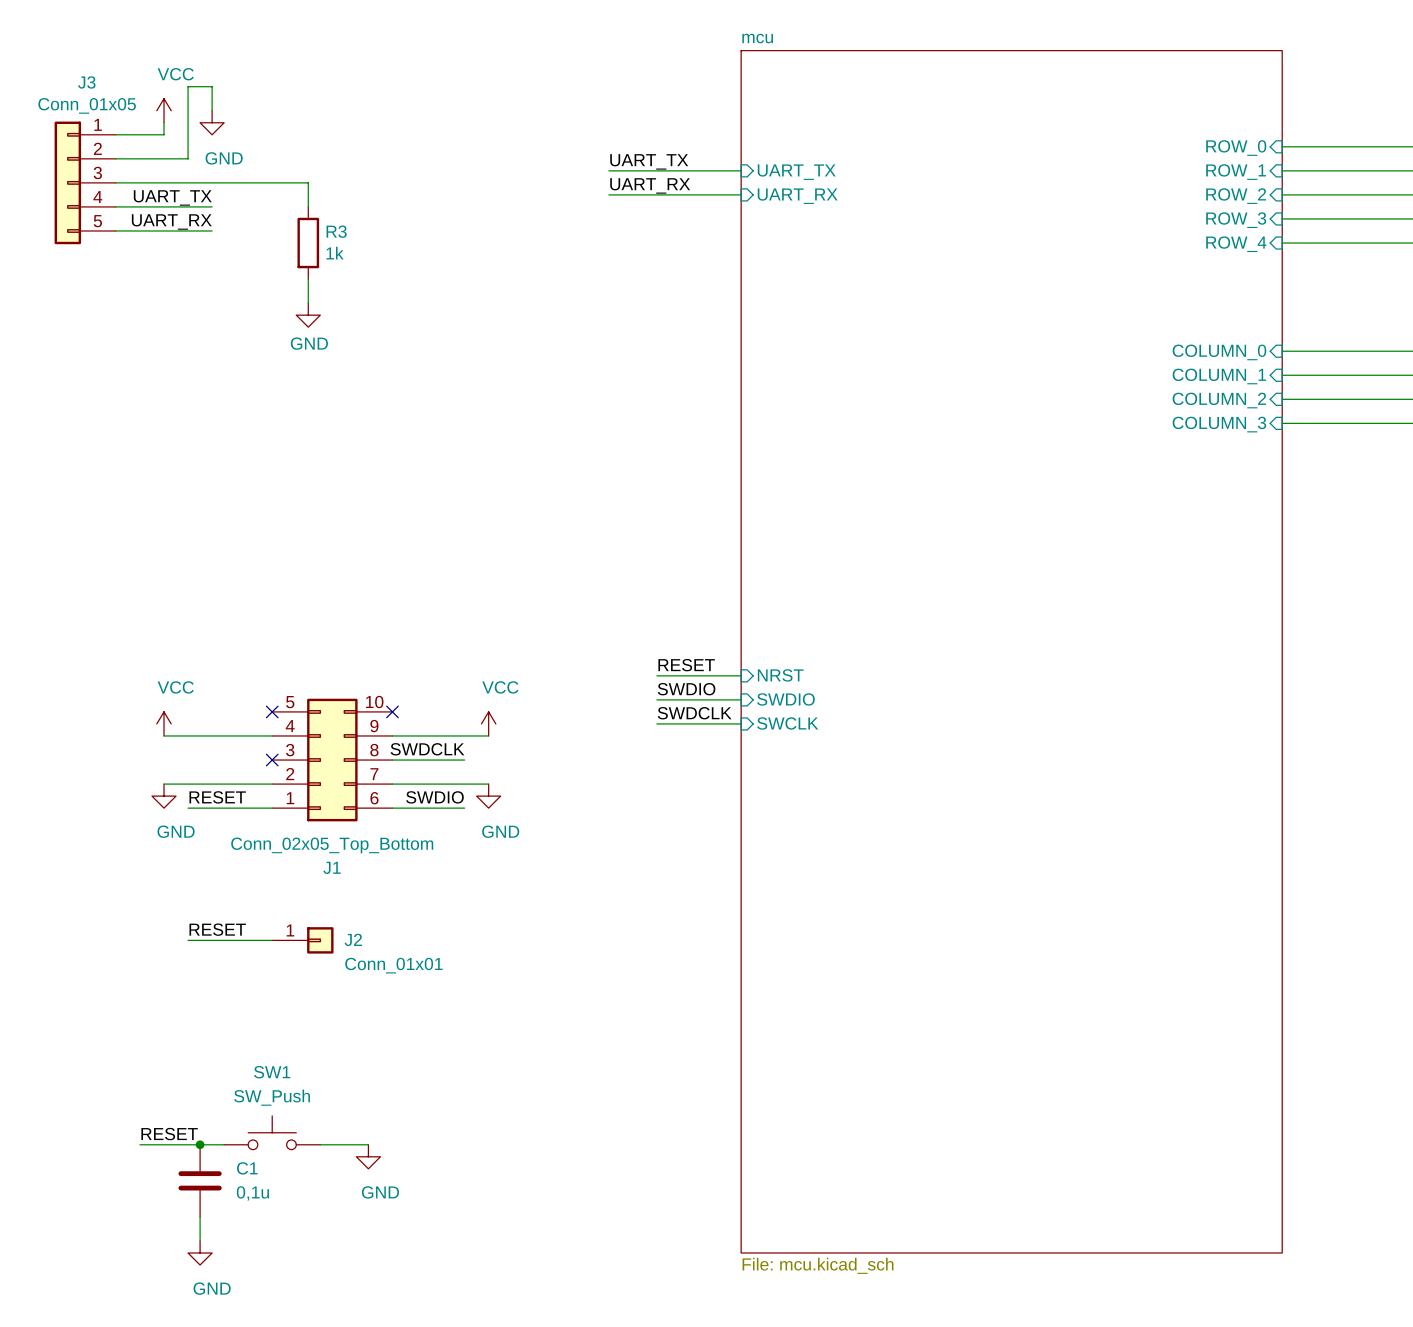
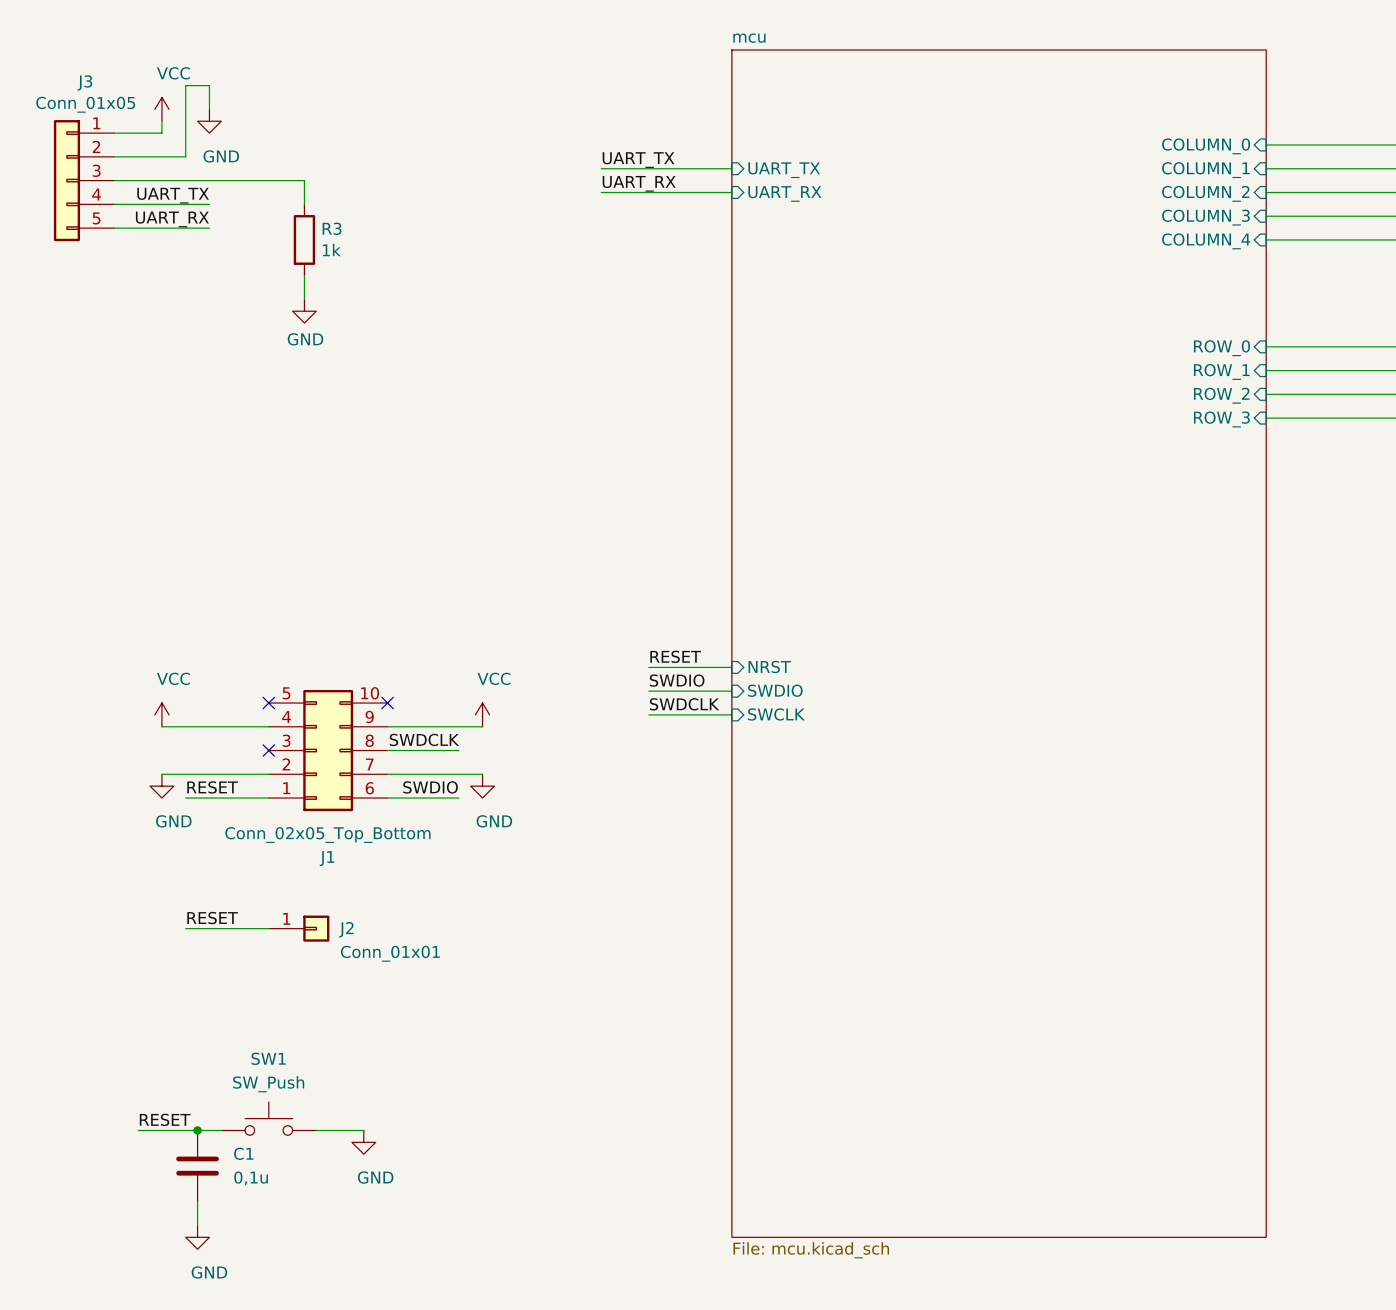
sheet pin: ROW_0 (1236, 148) -> COLUMN_0 (1206, 146)
sheet pin: ROW_1 (1236, 172) -> COLUMN_1 (1205, 170)
sheet pin: ROW_2 (1236, 196) -> COLUMN_2 (1205, 193)
sheet pin: ROW_3 (1236, 220) -> COLUMN_3 (1205, 217)
sheet pin: ROW_4 (1236, 244) -> COLUMN_4 (1206, 241)
sheet pin: COLUMN_0 (1219, 352) -> ROW_0 (1221, 348)
sheet pin: COLUMN_1 (1219, 376) -> ROW_1 (1221, 371)
sheet pin: COLUMN_2 (1219, 400) -> ROW_2 (1221, 395)
sheet pin: COLUMN_3 (1219, 424) -> ROW_3 (1221, 419)

